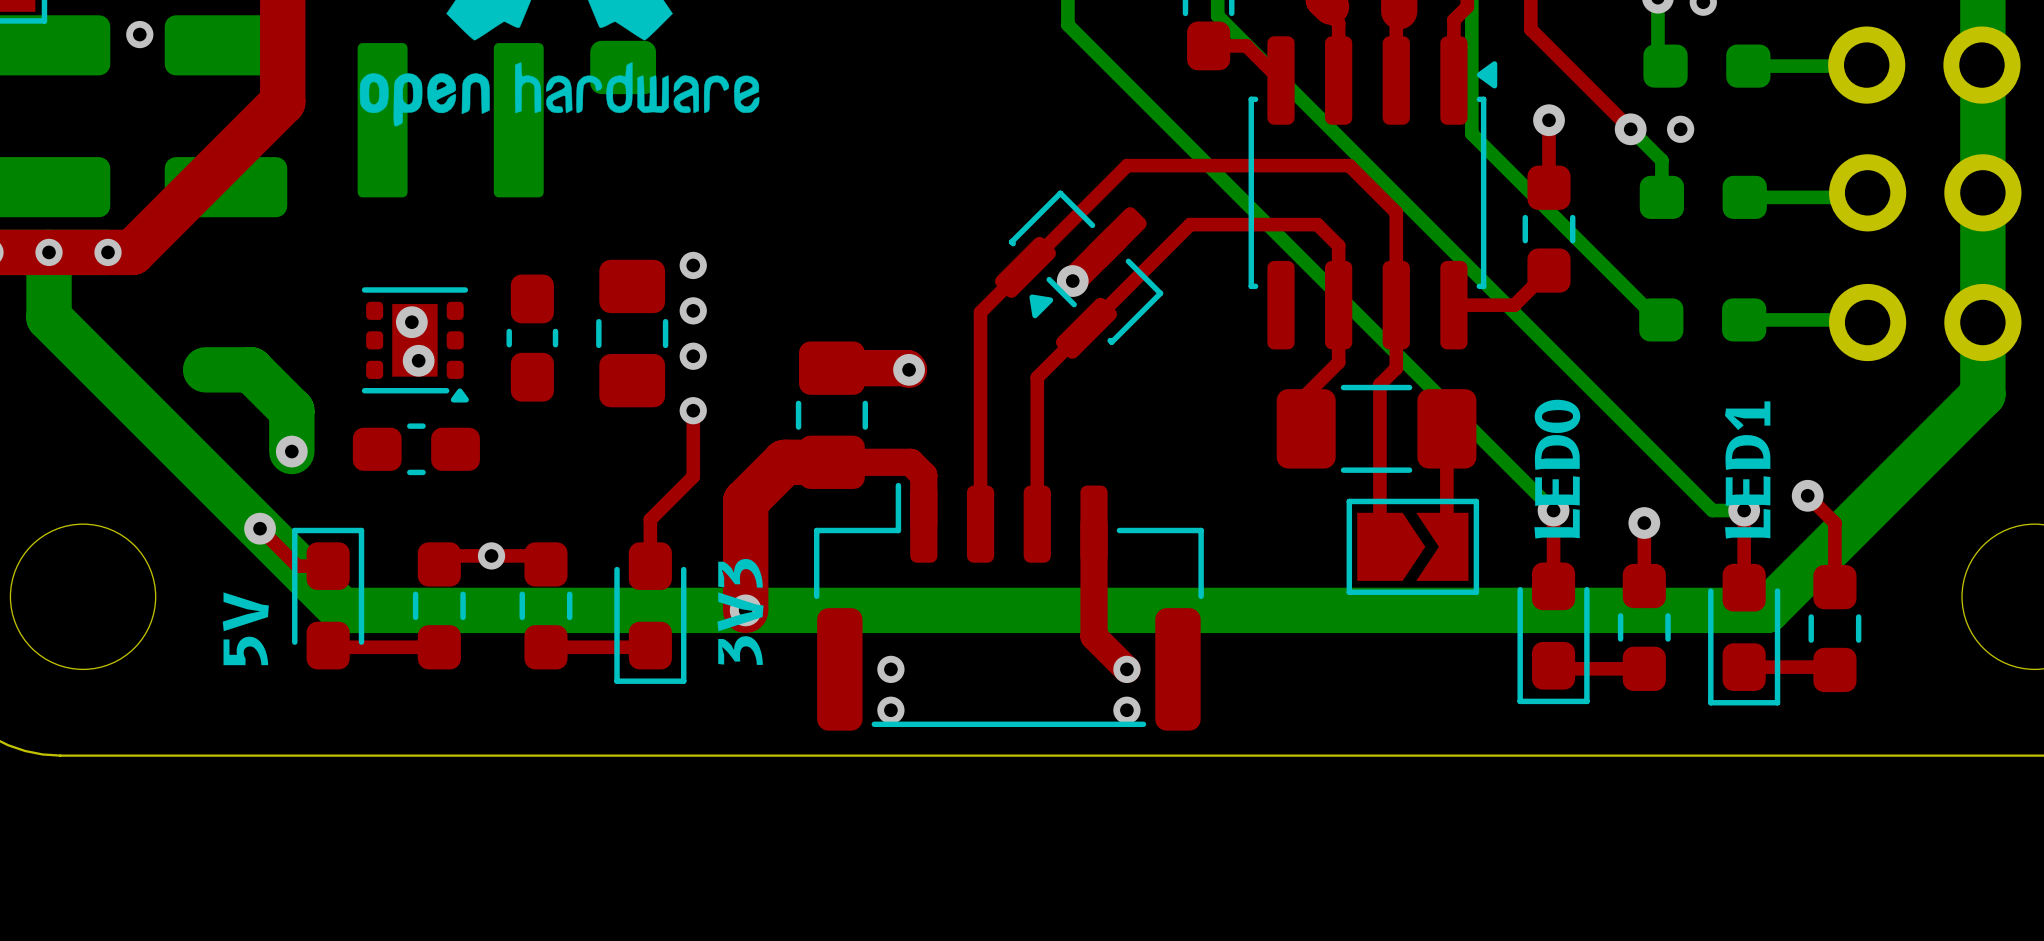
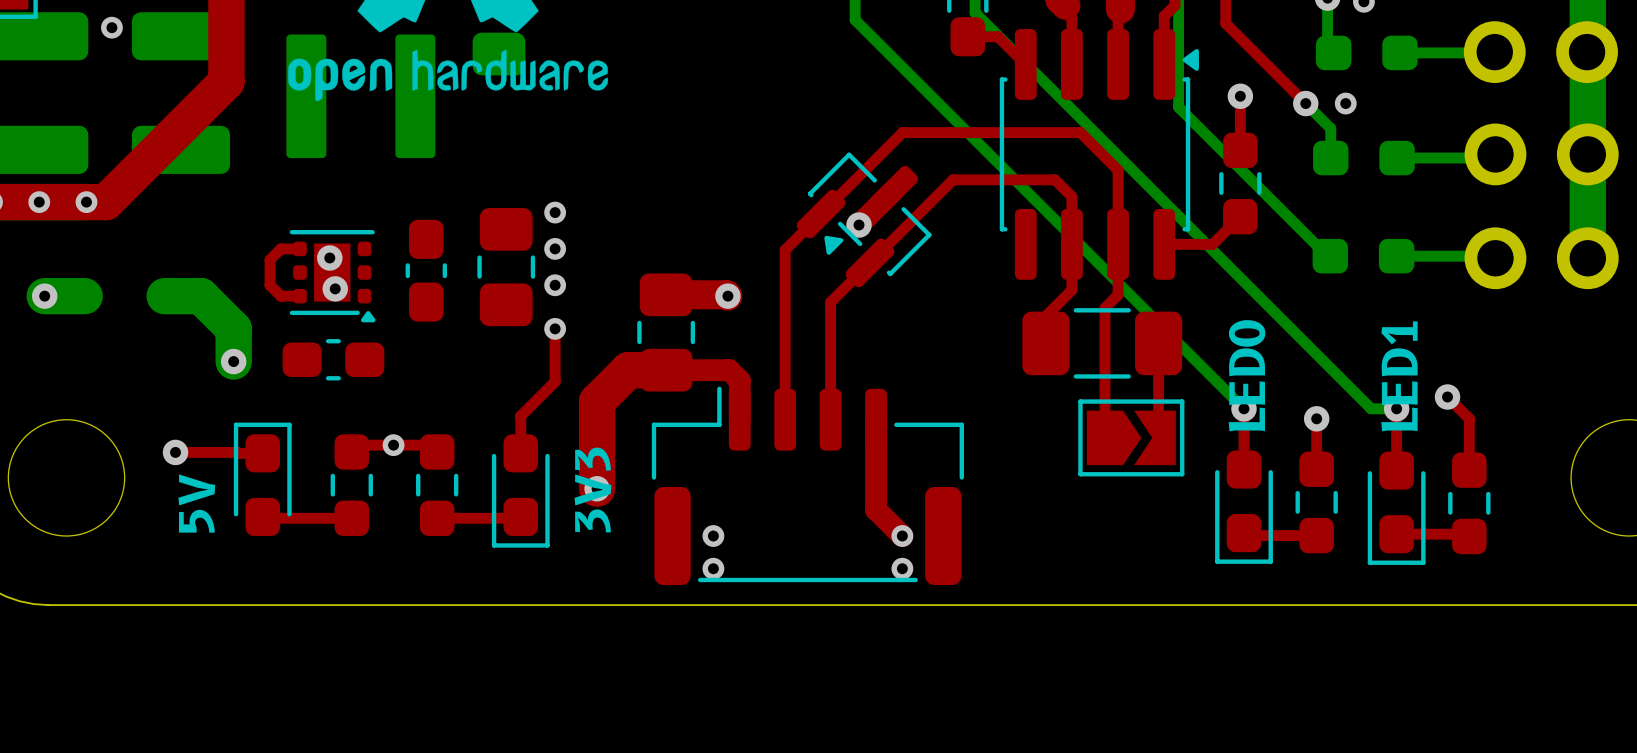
bottom track: (49, 252) (49, 317) (341, 610) (1766, 610) (1982, 394) (1982, 322) -> none
top track: none -> (300, 248) (280, 248) (270, 259) (270, 285) (280, 296) (300, 296)
bottom track: none -> (44, 296) (84, 296)
via: none -> (44, 296)
top track: (260, 528) (296, 565) -> (175, 452) (237, 452)
via position: (260, 528) -> (175, 452)

